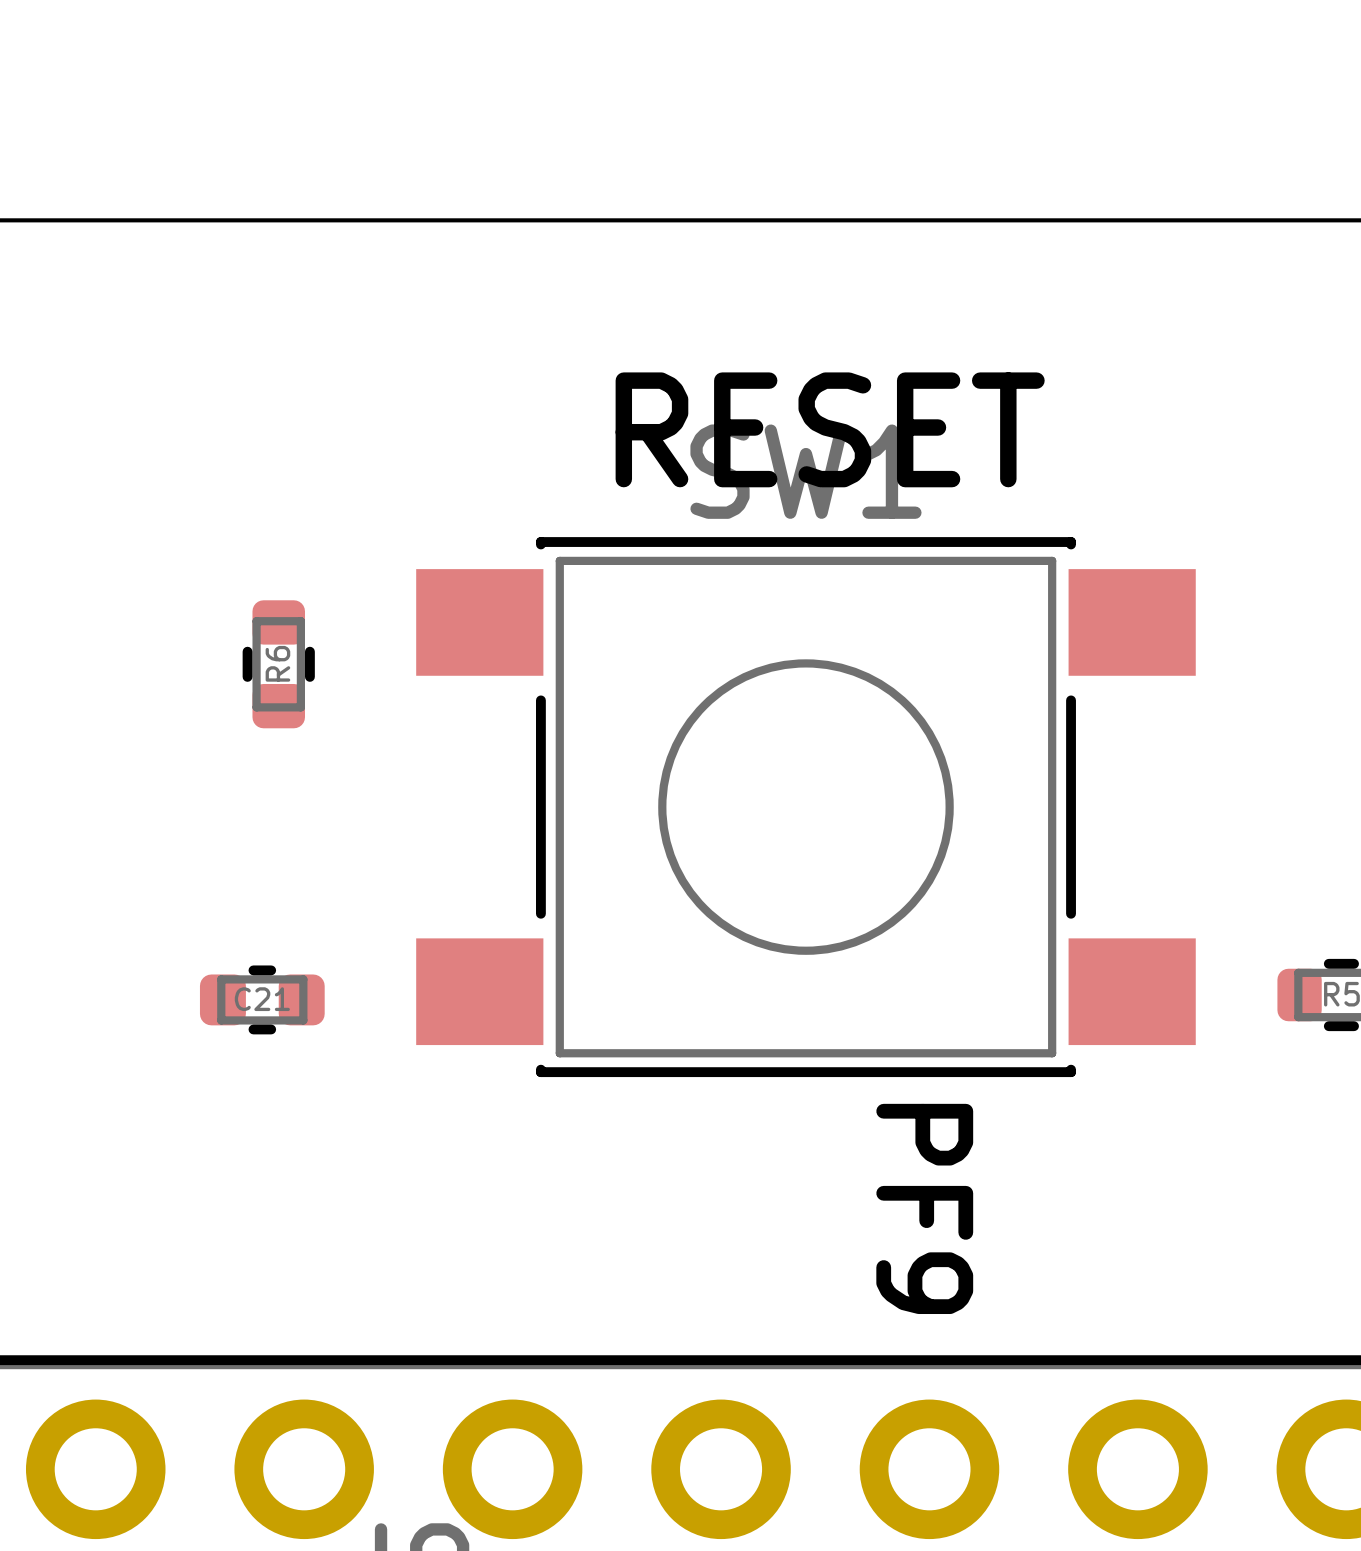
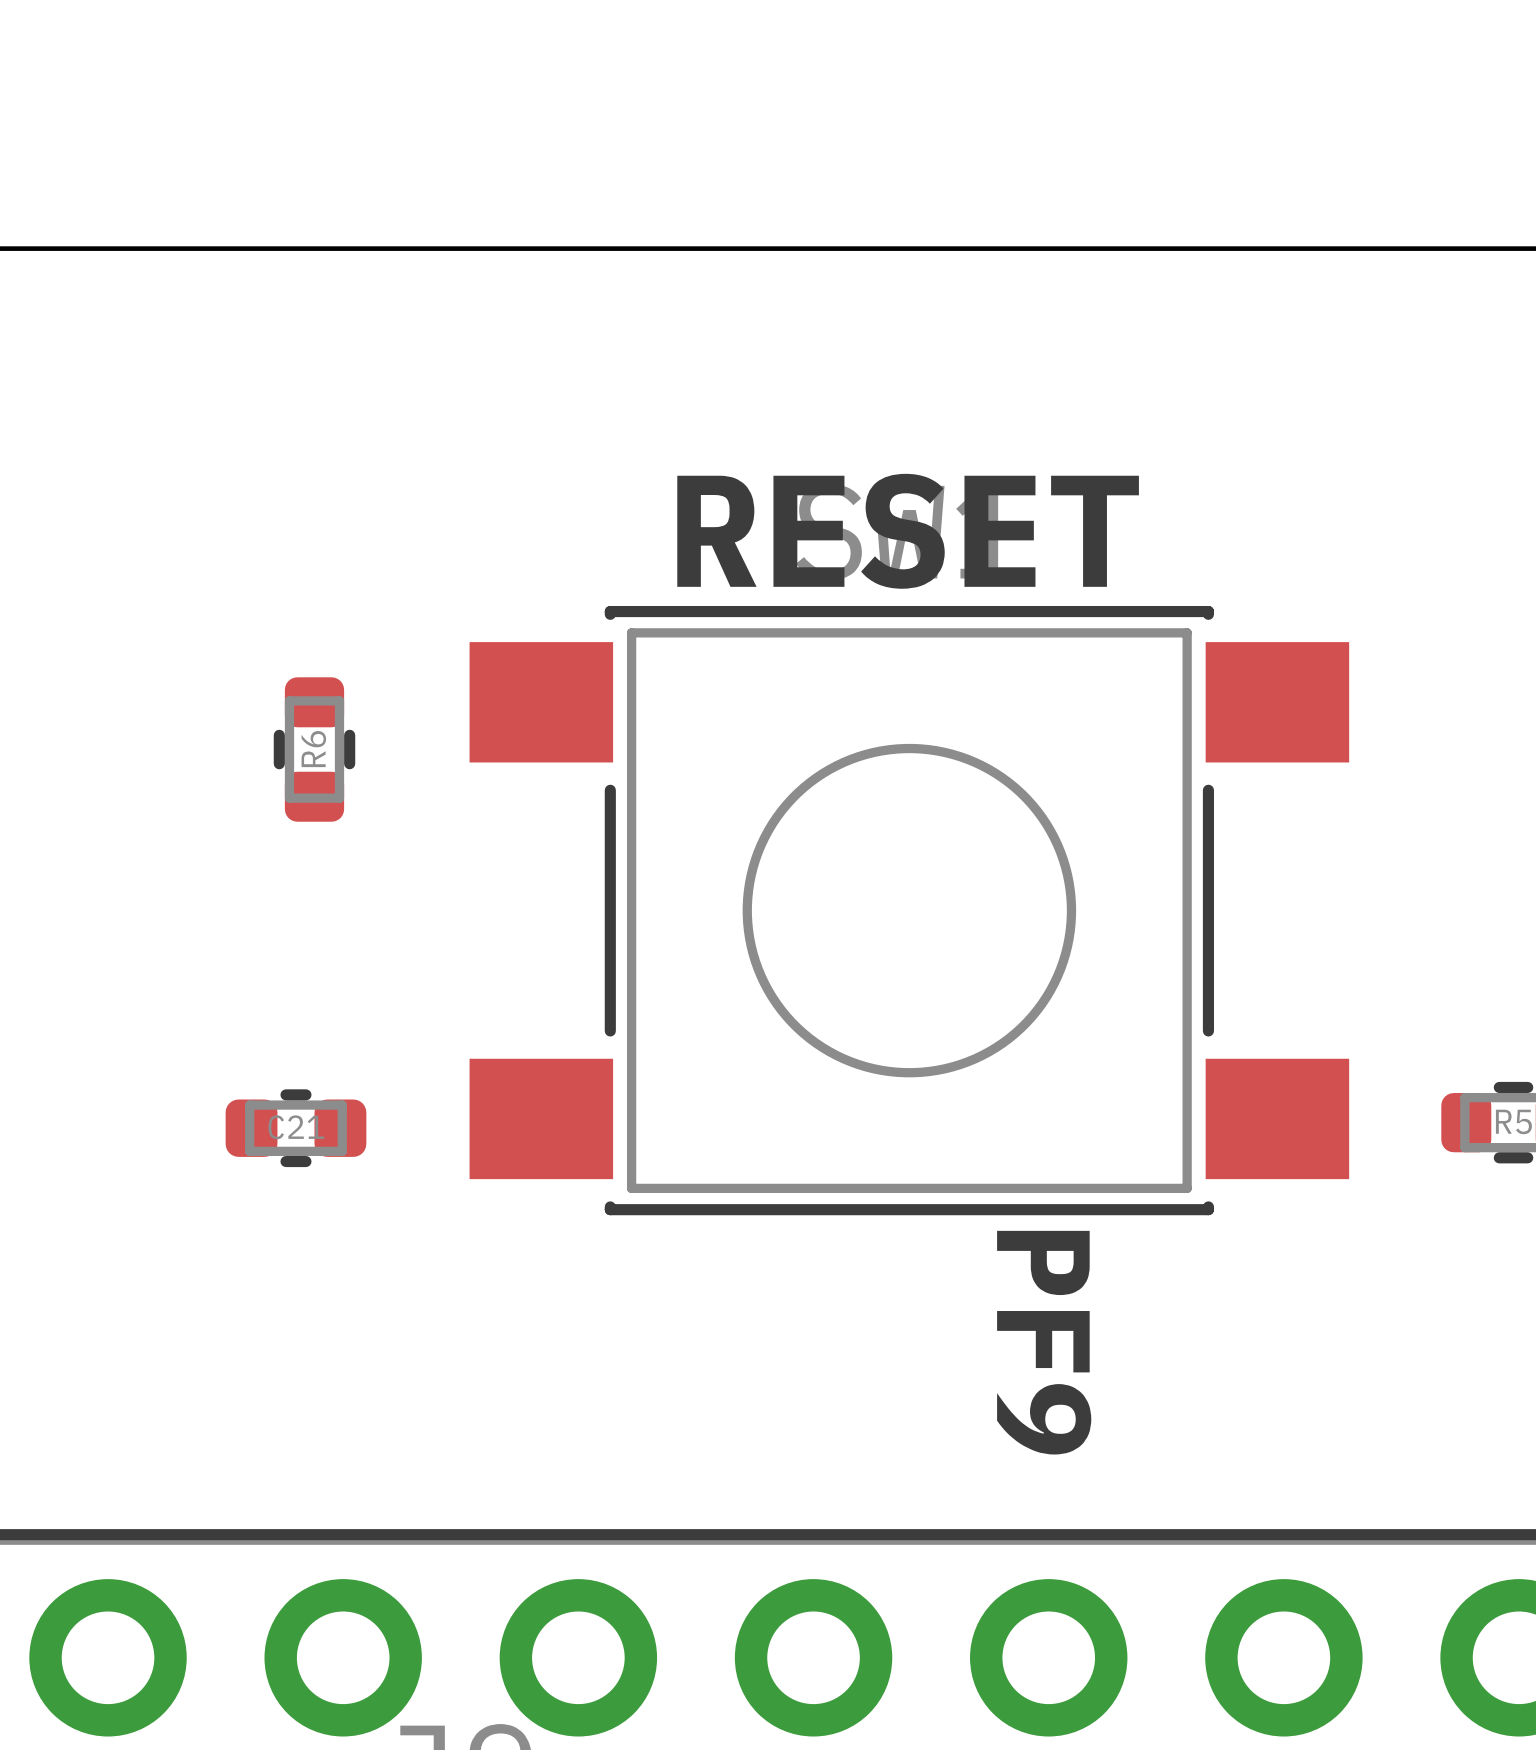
text position: RESET (830, 429) -> RESET (908, 531)

